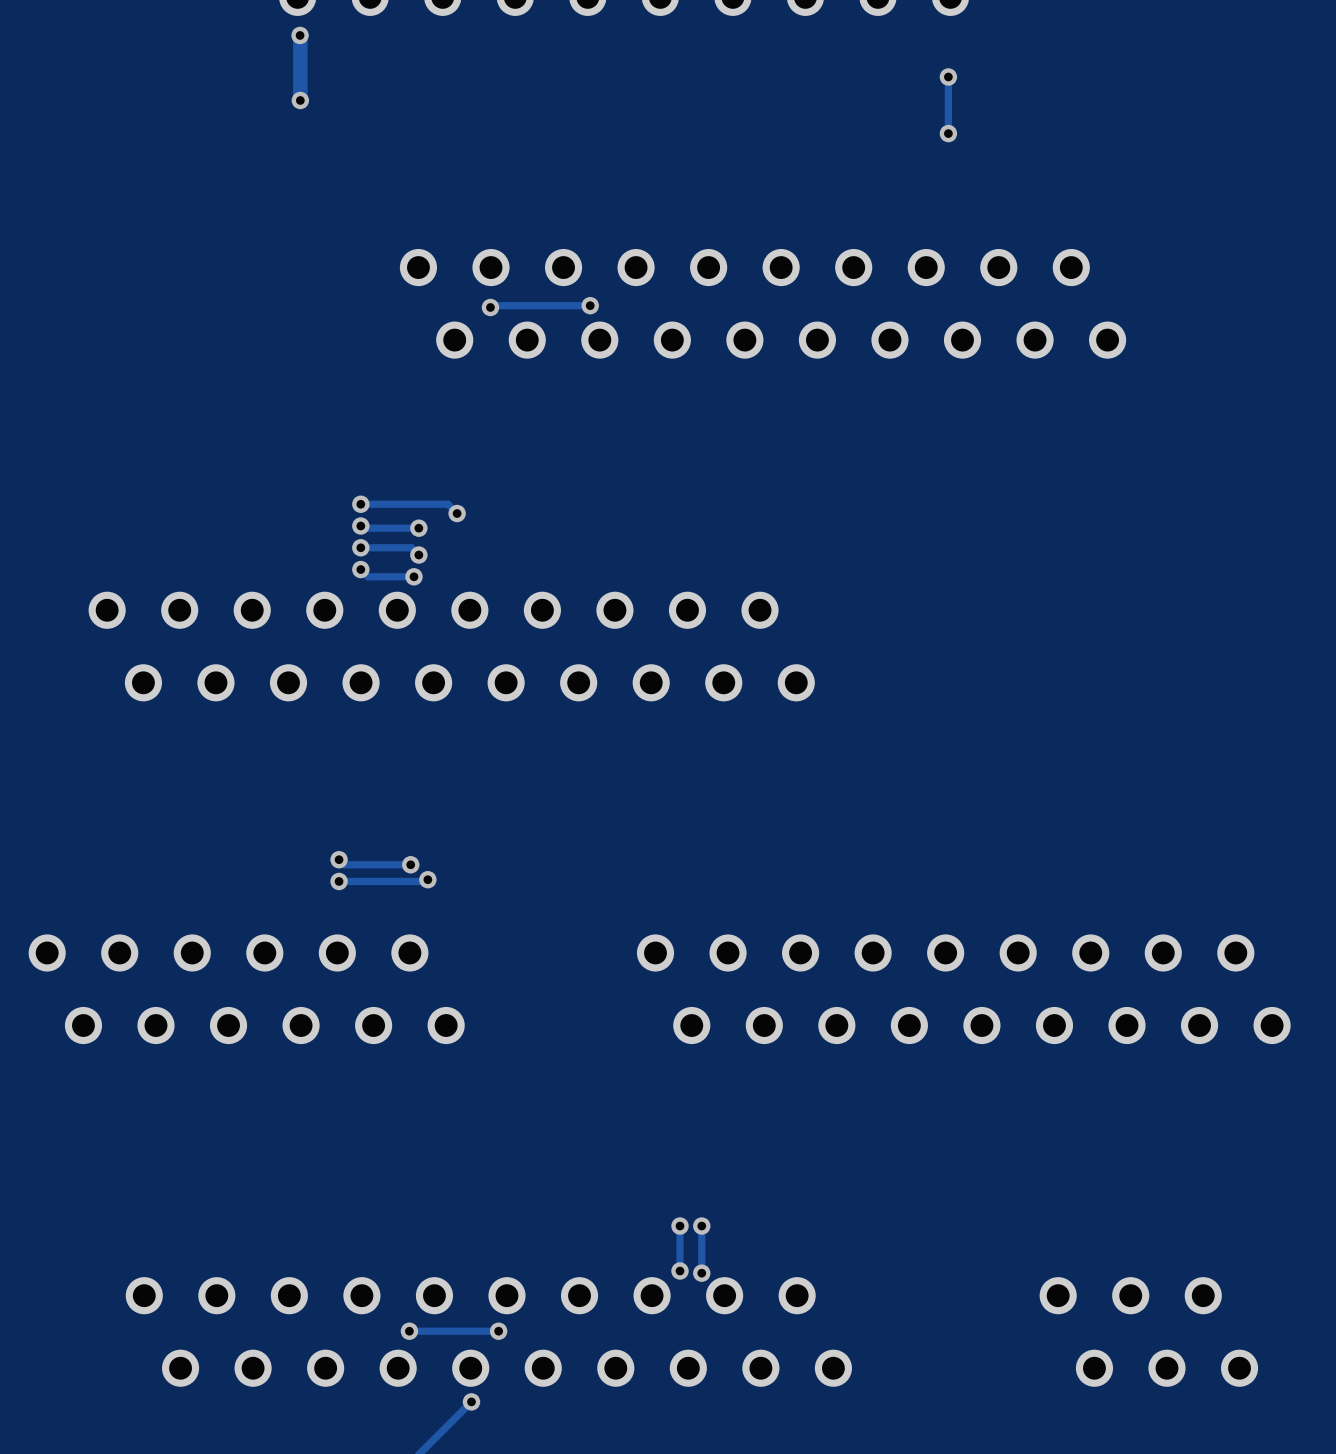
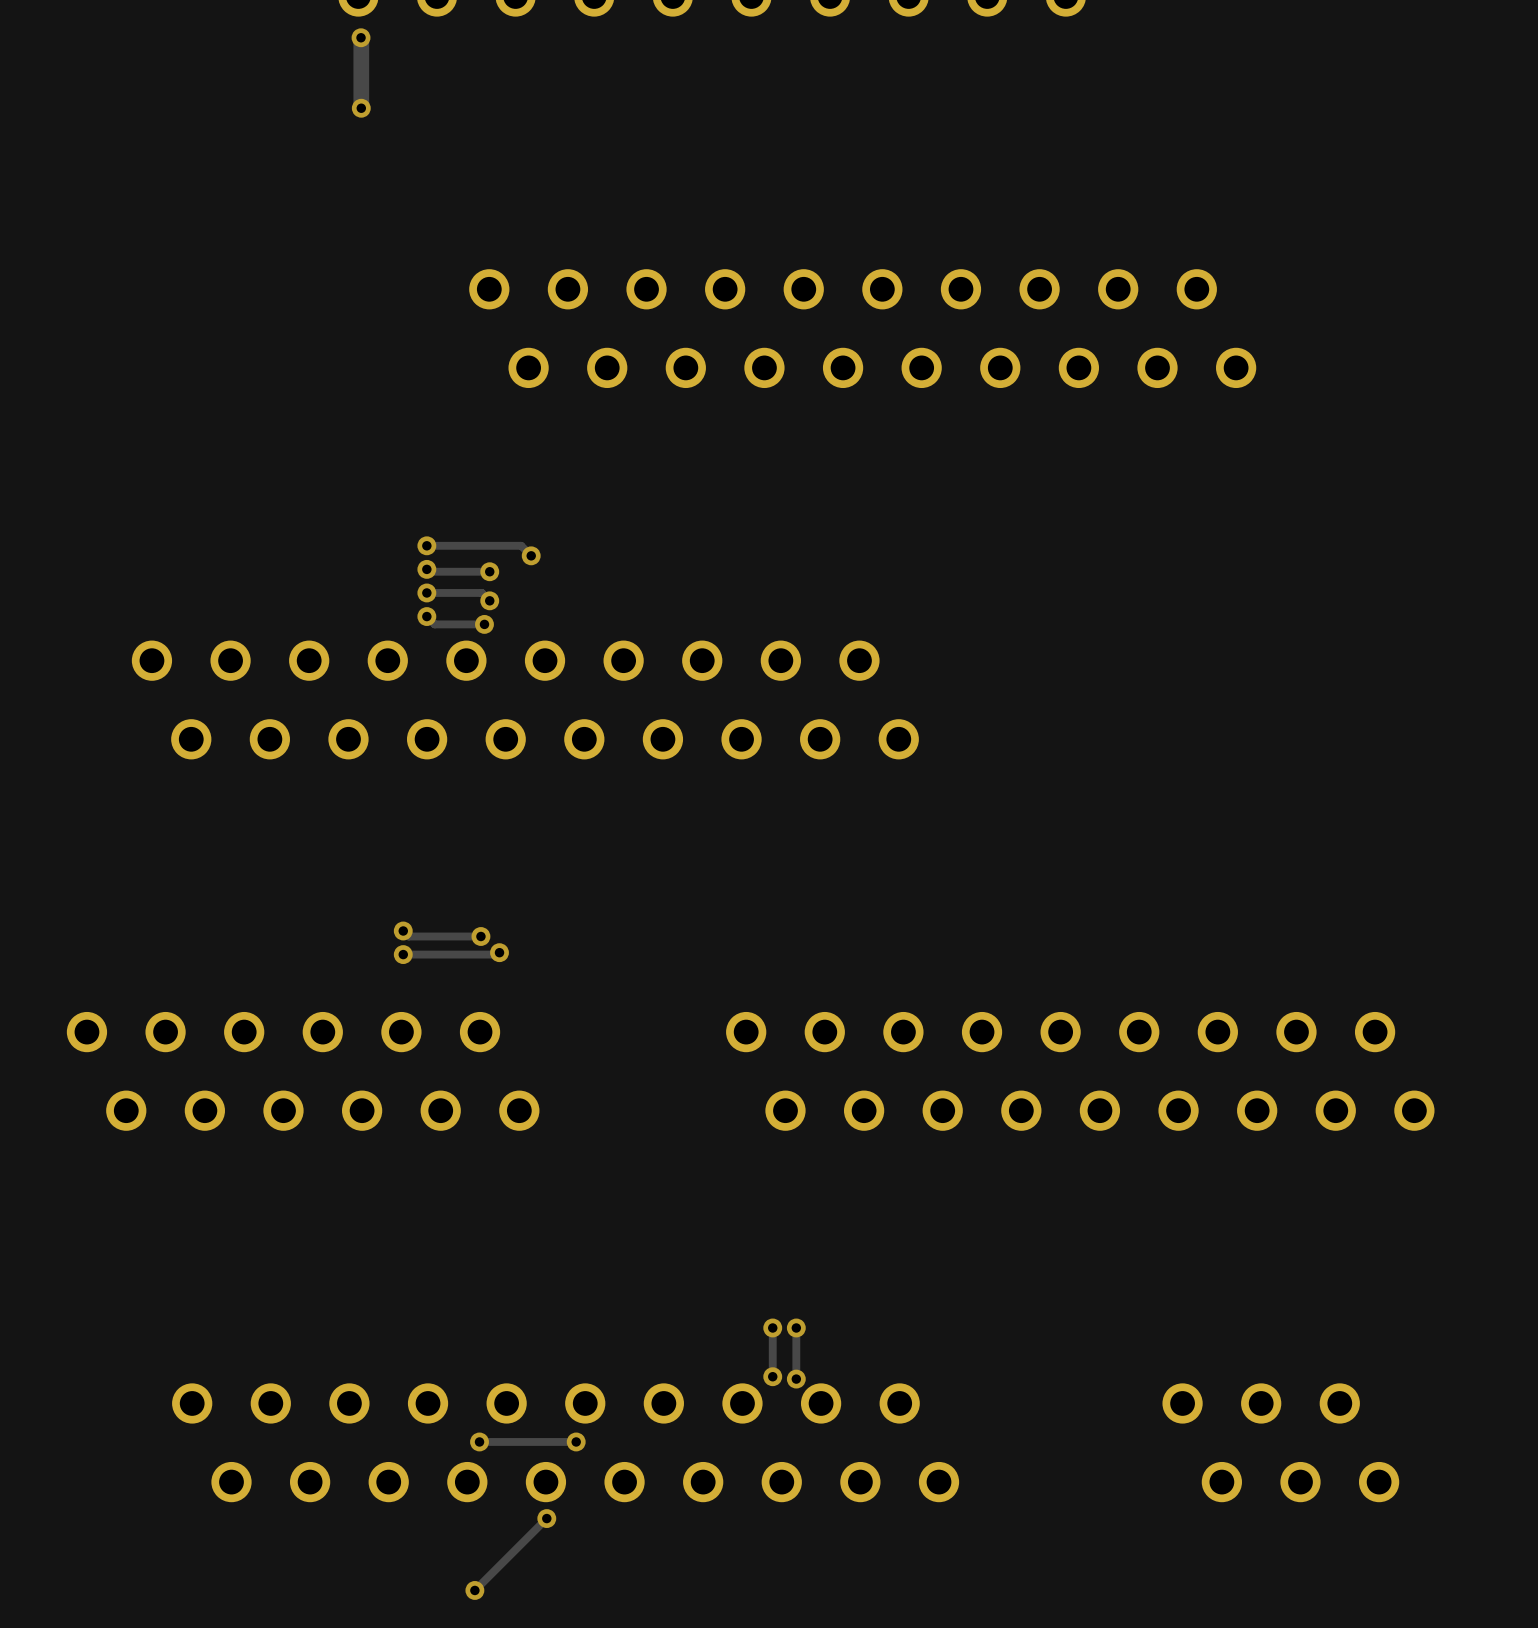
track: (948, 76) (948, 133) -> none
via: (948, 76) -> none
via: (948, 133) -> none
track: (590, 305) (492, 305) (490, 307) -> none
via: (590, 305) -> none
via: (490, 307) -> none

